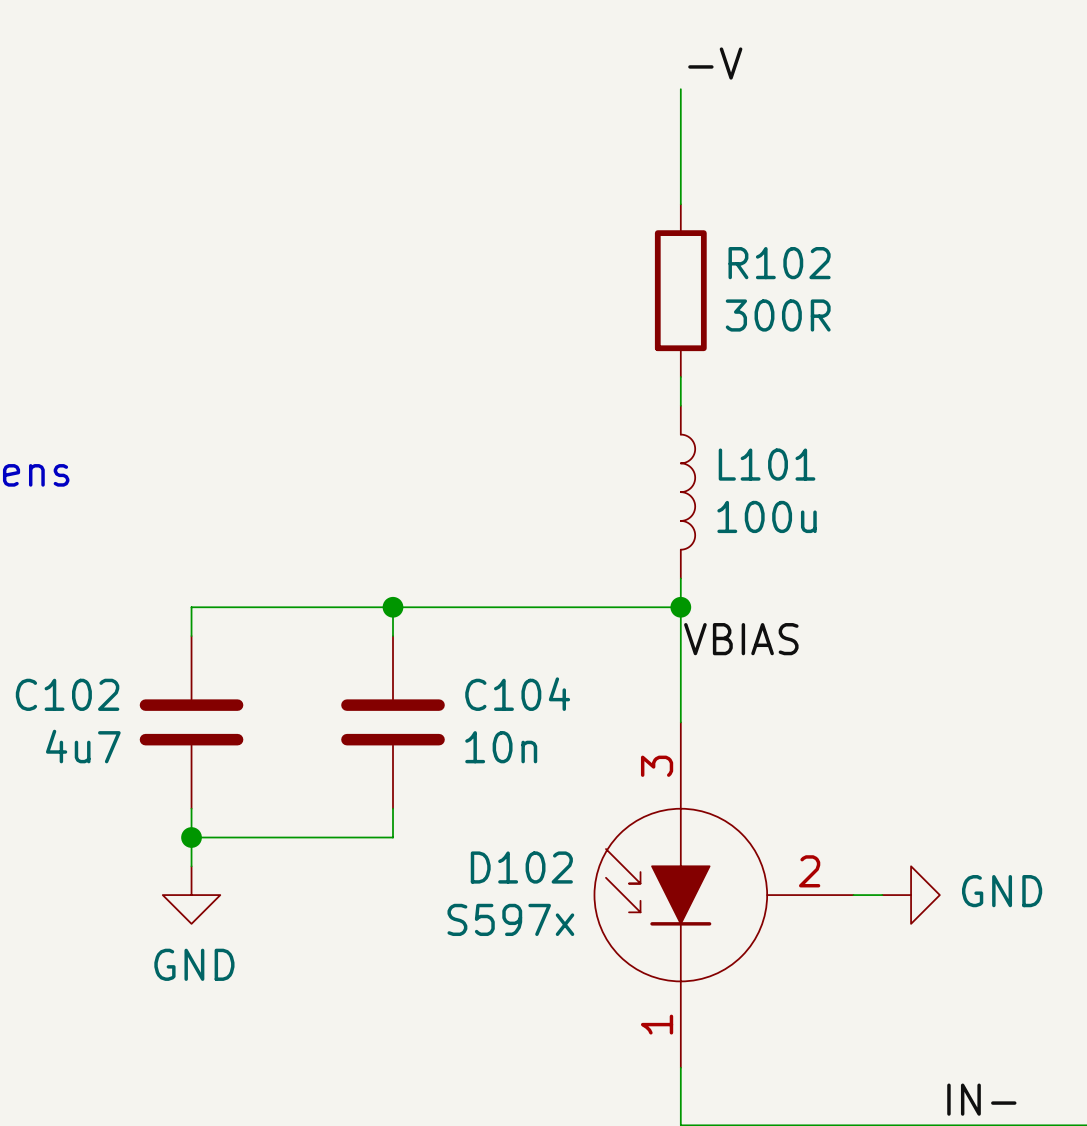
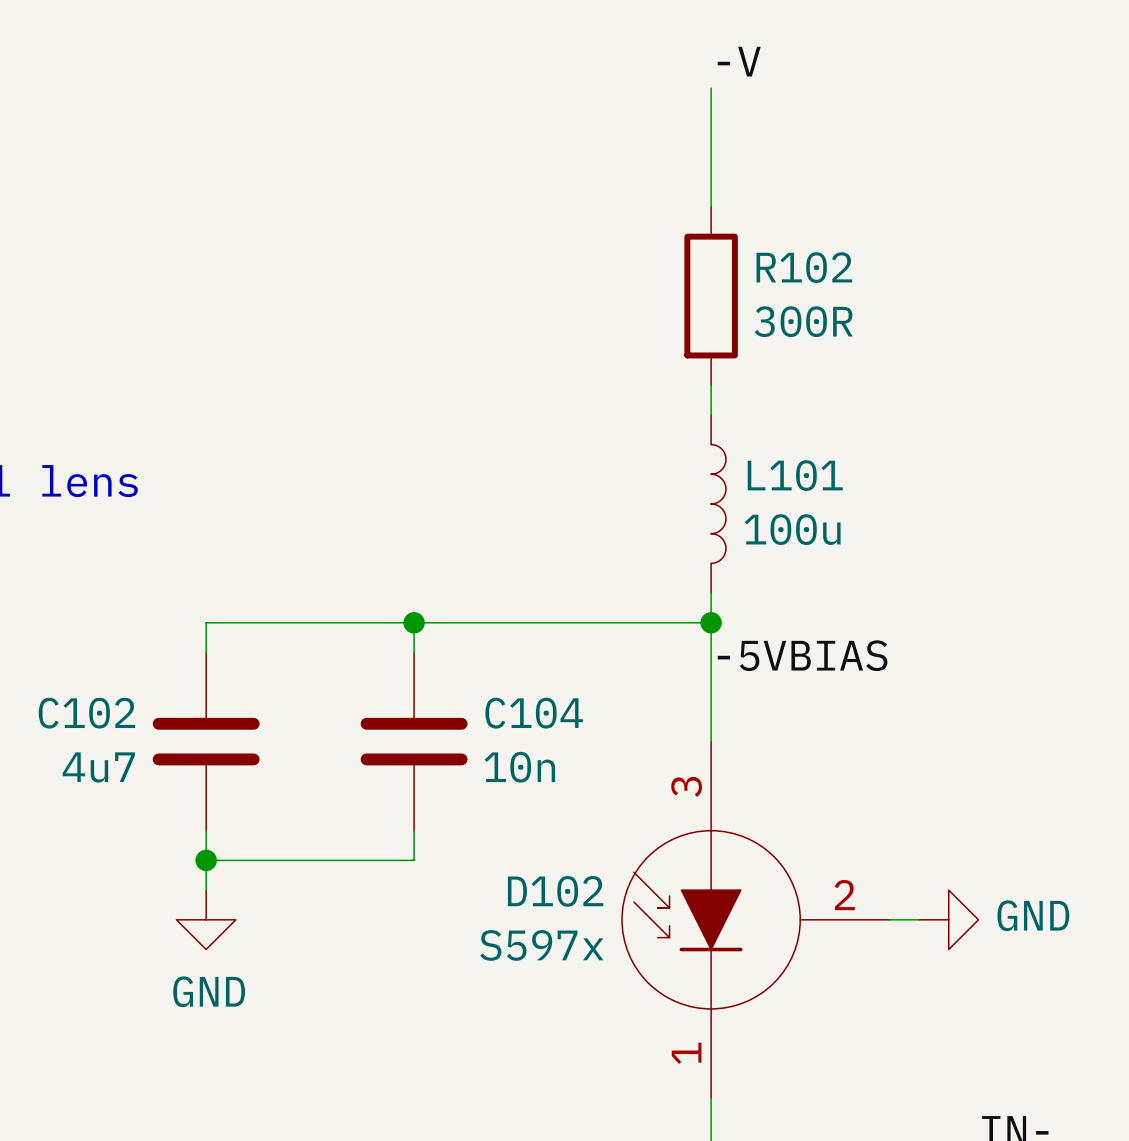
label: VBIAS (741, 639) -> -5VBIAS (802, 655)

